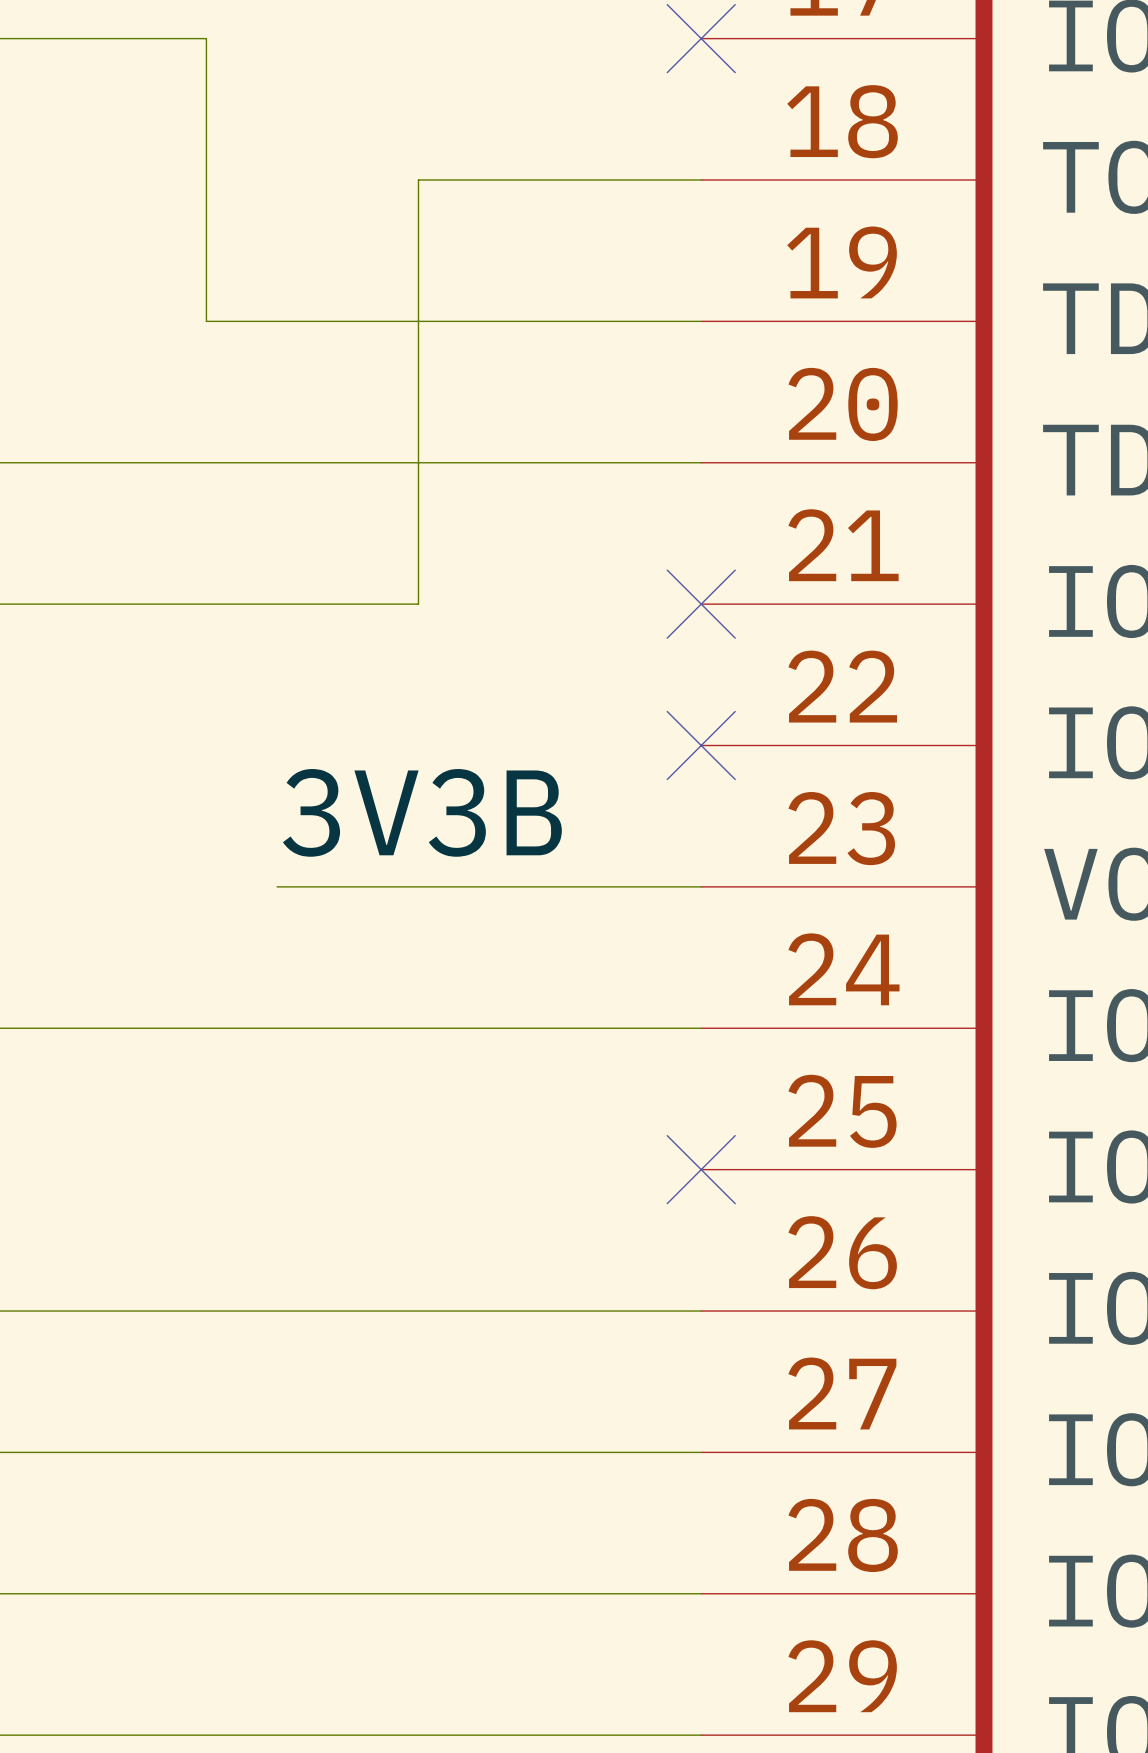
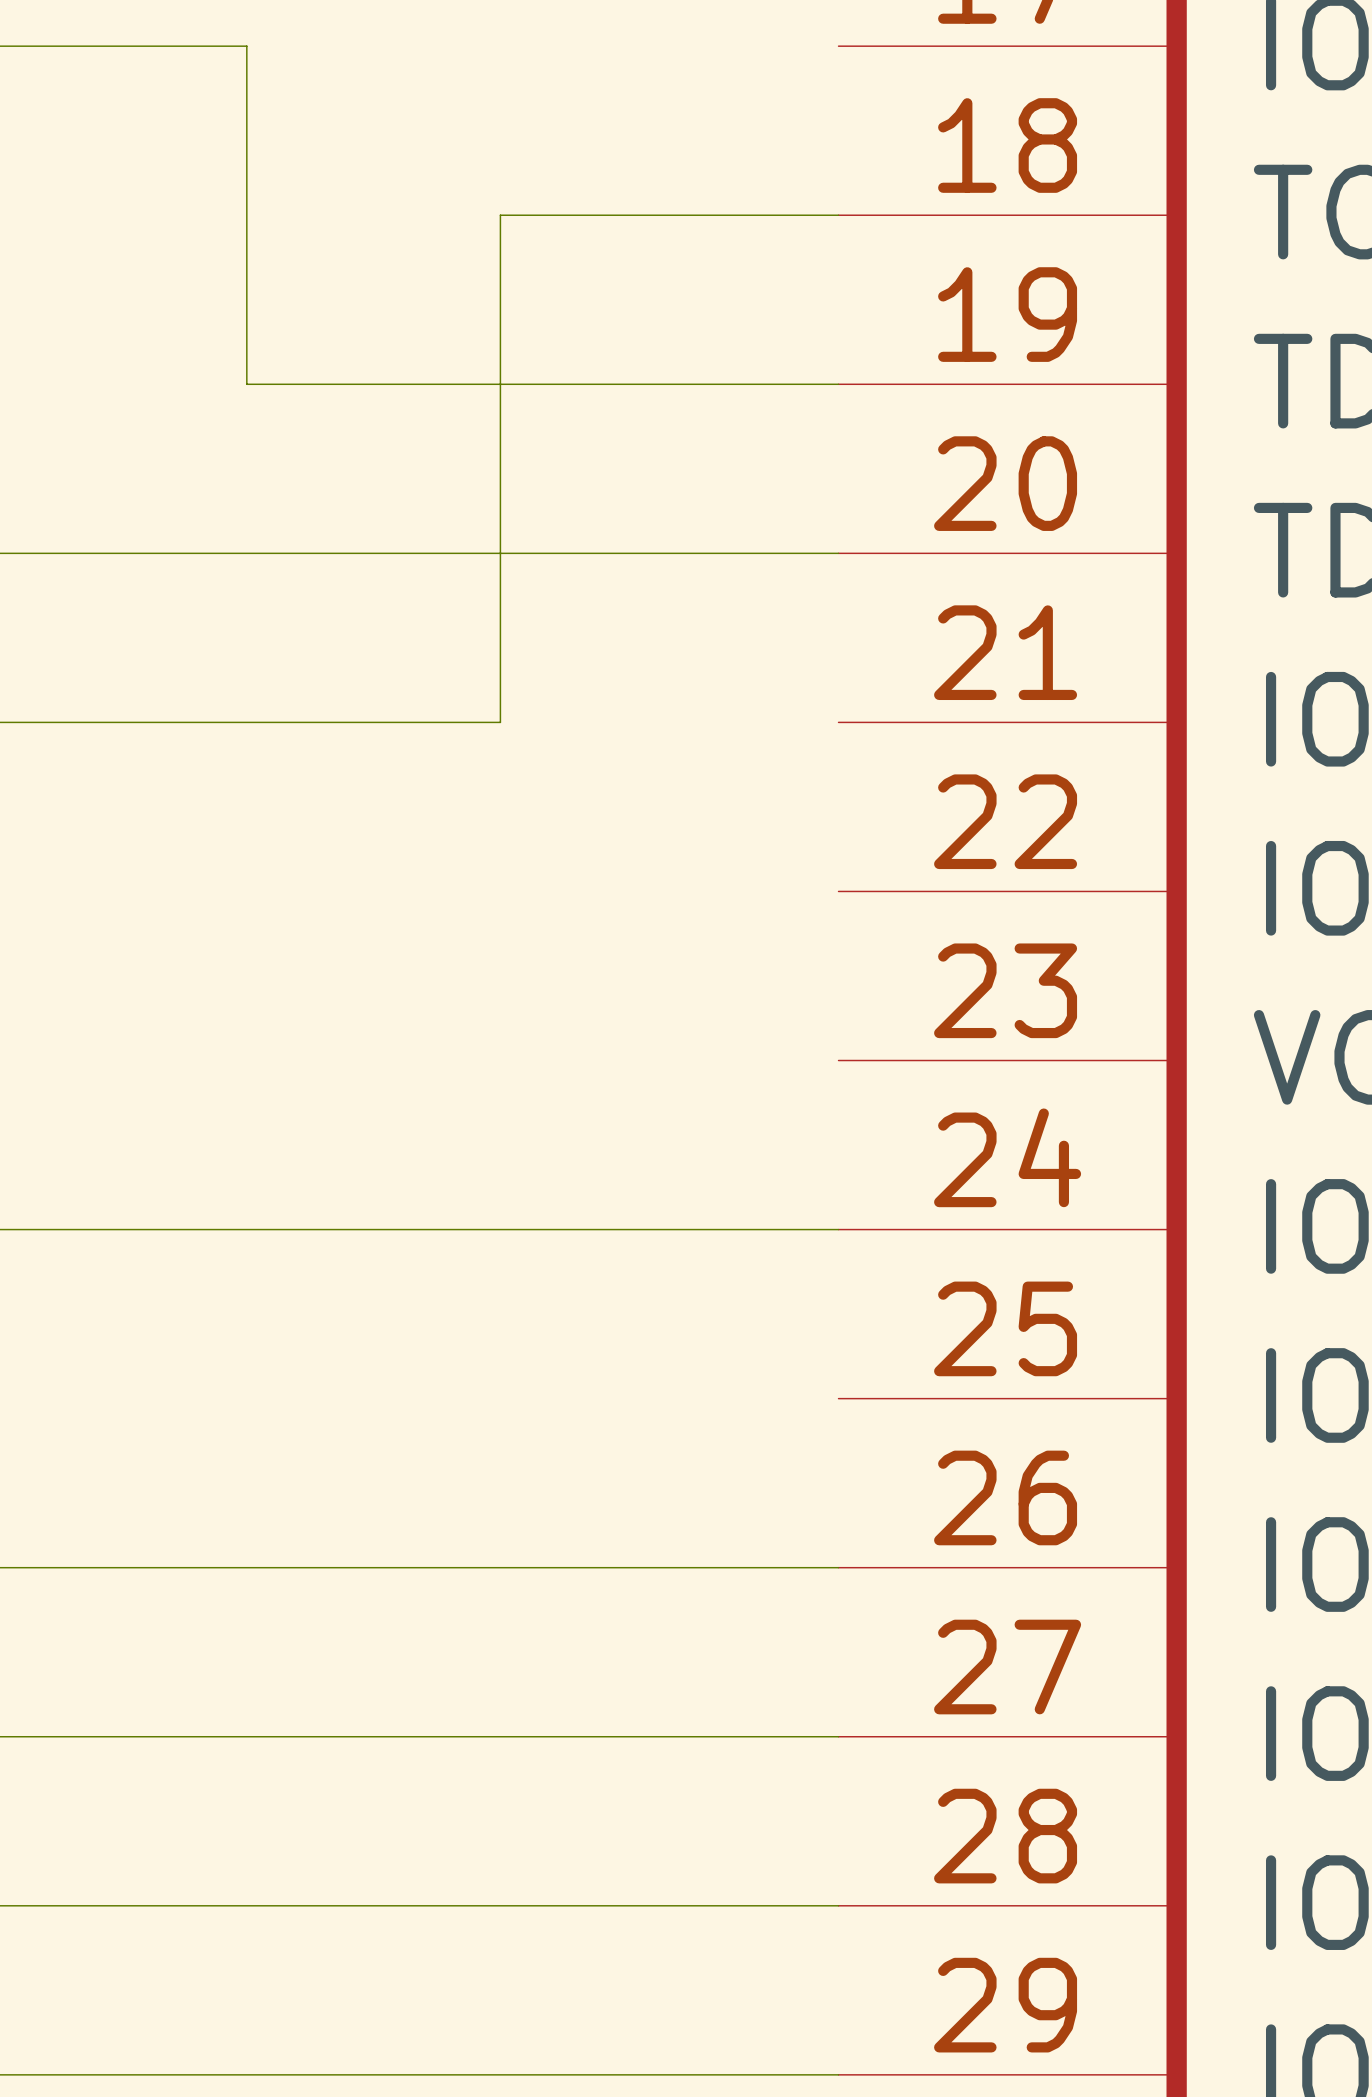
no-connect mark: (701, 38) -> none
no-connect mark: (701, 604) -> none
no-connect mark: (701, 745) -> none
label: 3V3B (422, 812) -> none
wire: (277, 886) (701, 886) -> none
no-connect mark: (701, 1169) -> none

